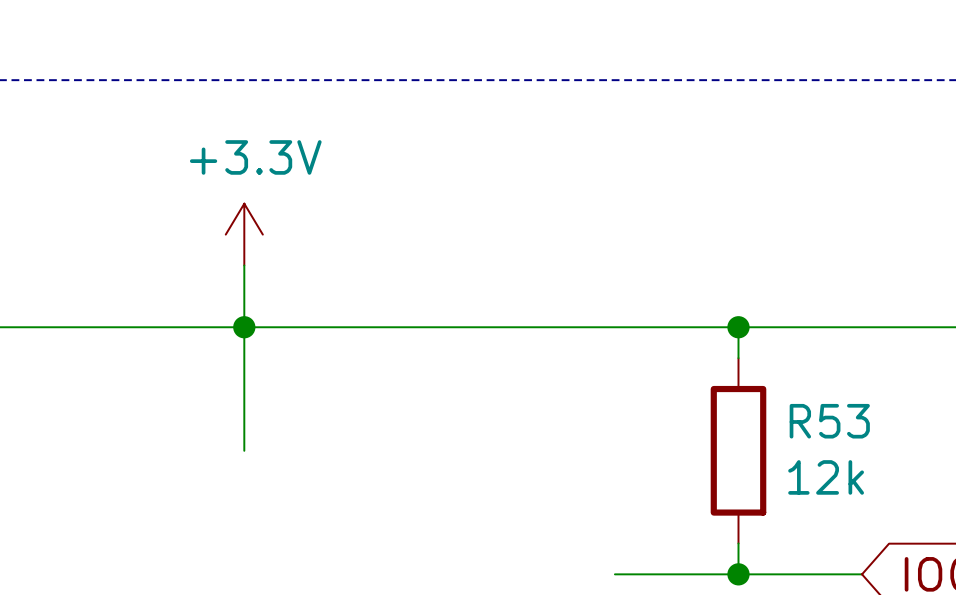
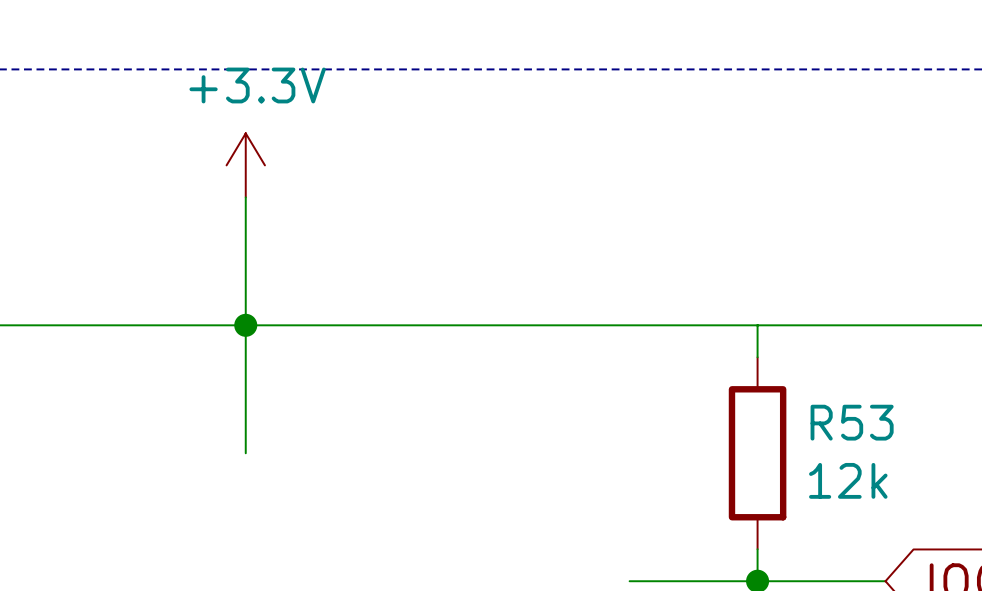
power symbol position: +3.3V (244, 234) -> +3.3V (245, 165)
junction: (738, 327) -> none

